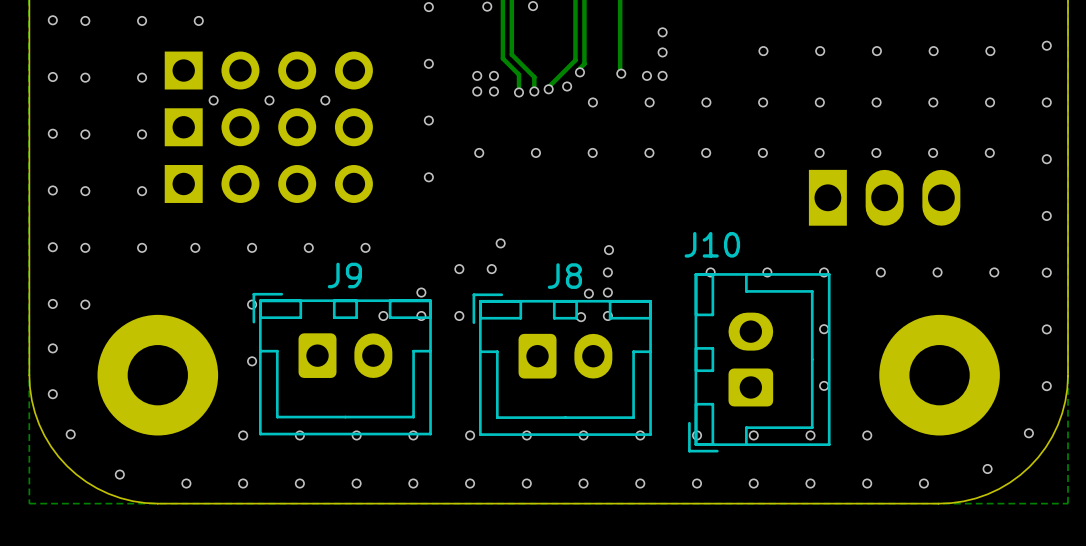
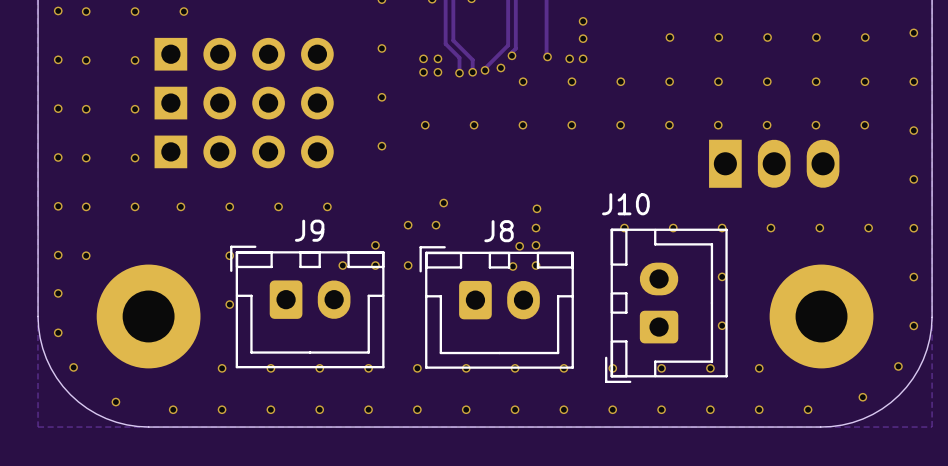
via: (213, 100) -> none
via: (269, 100) -> none
via: (325, 100) -> none

